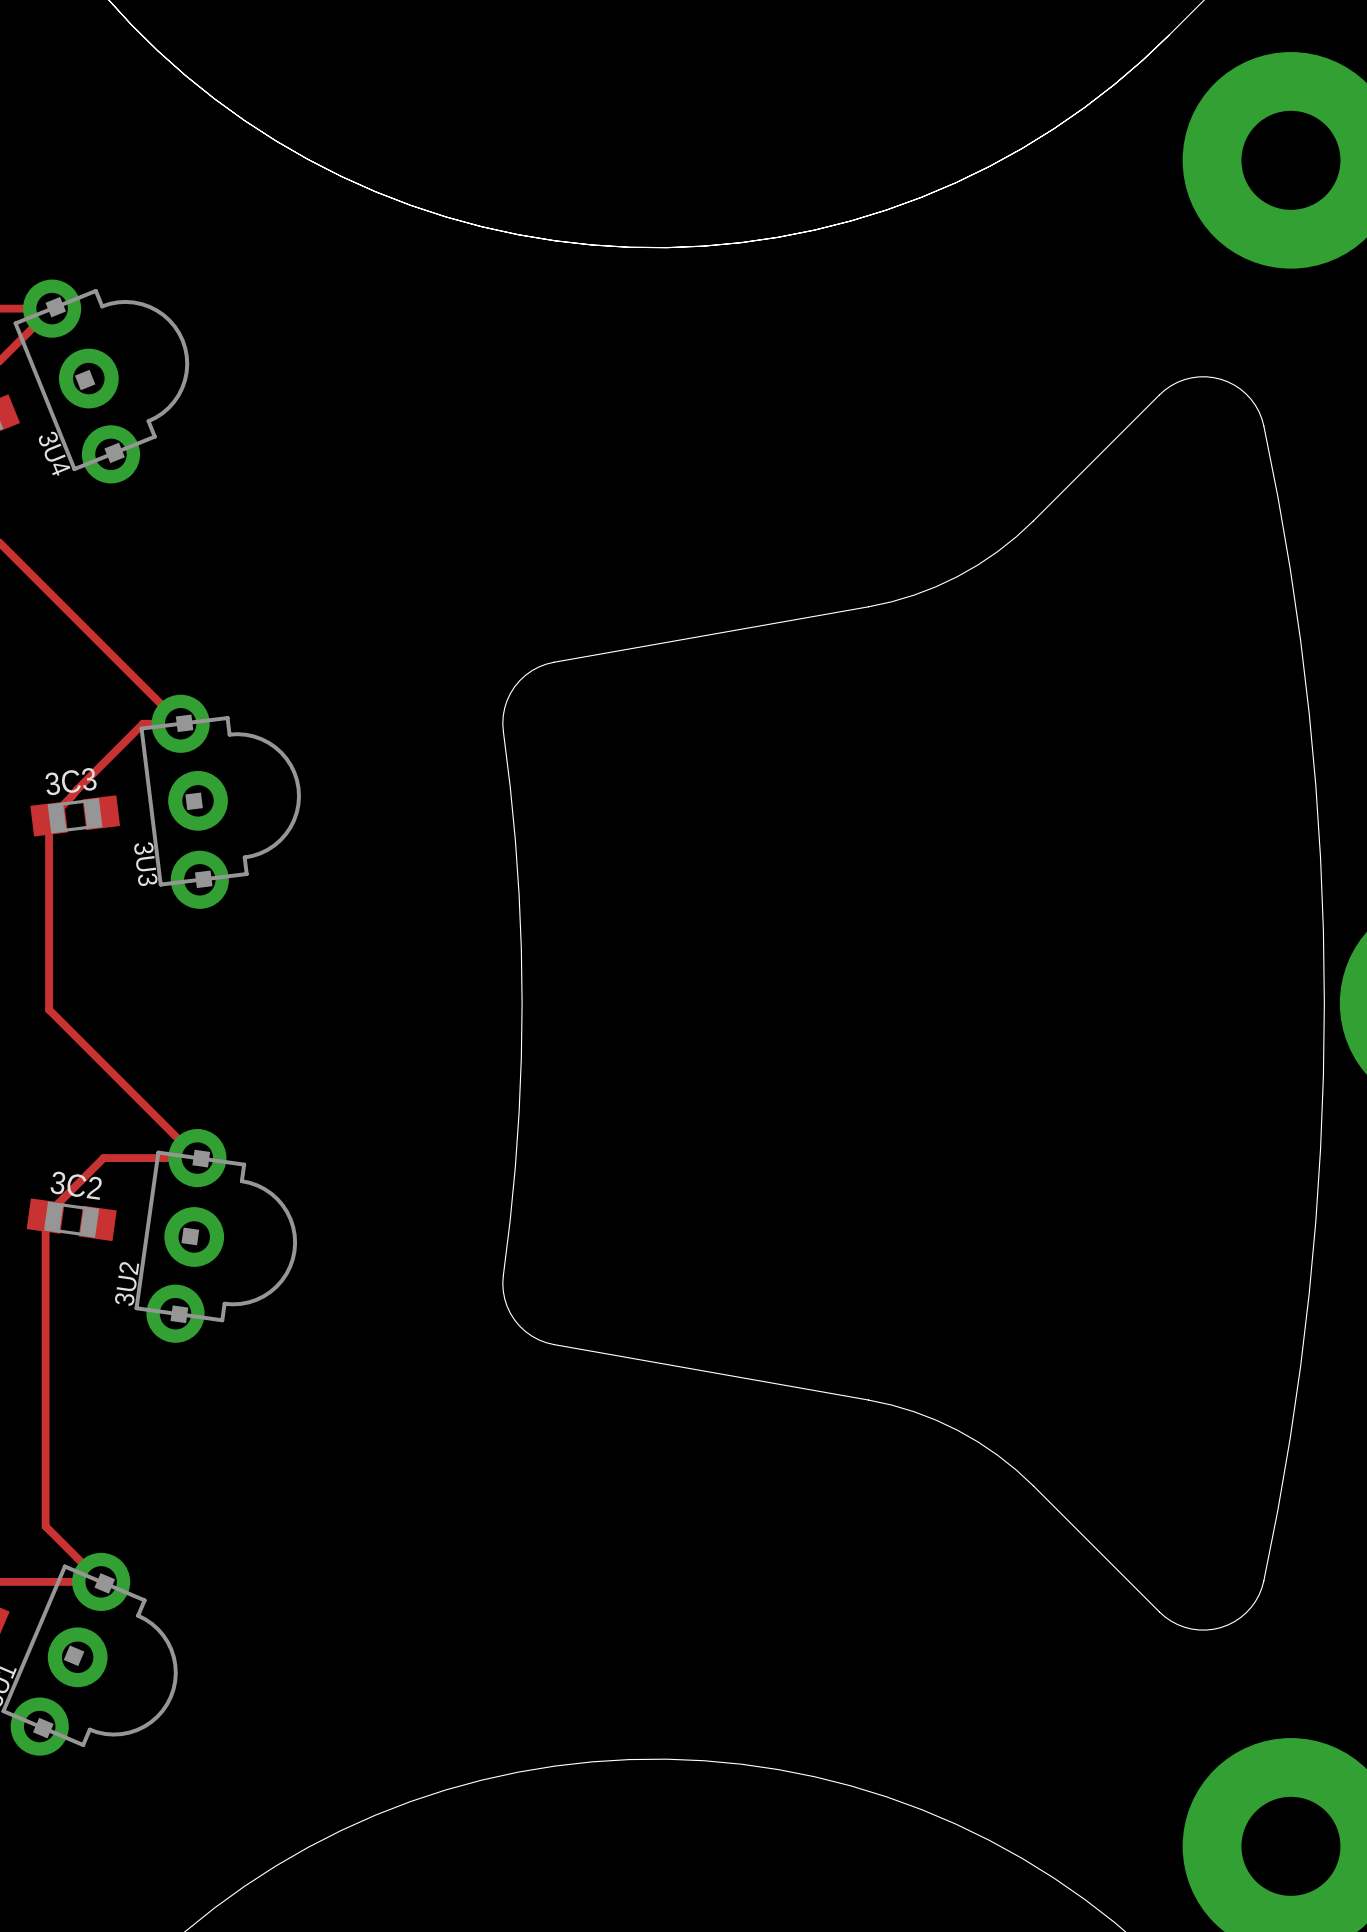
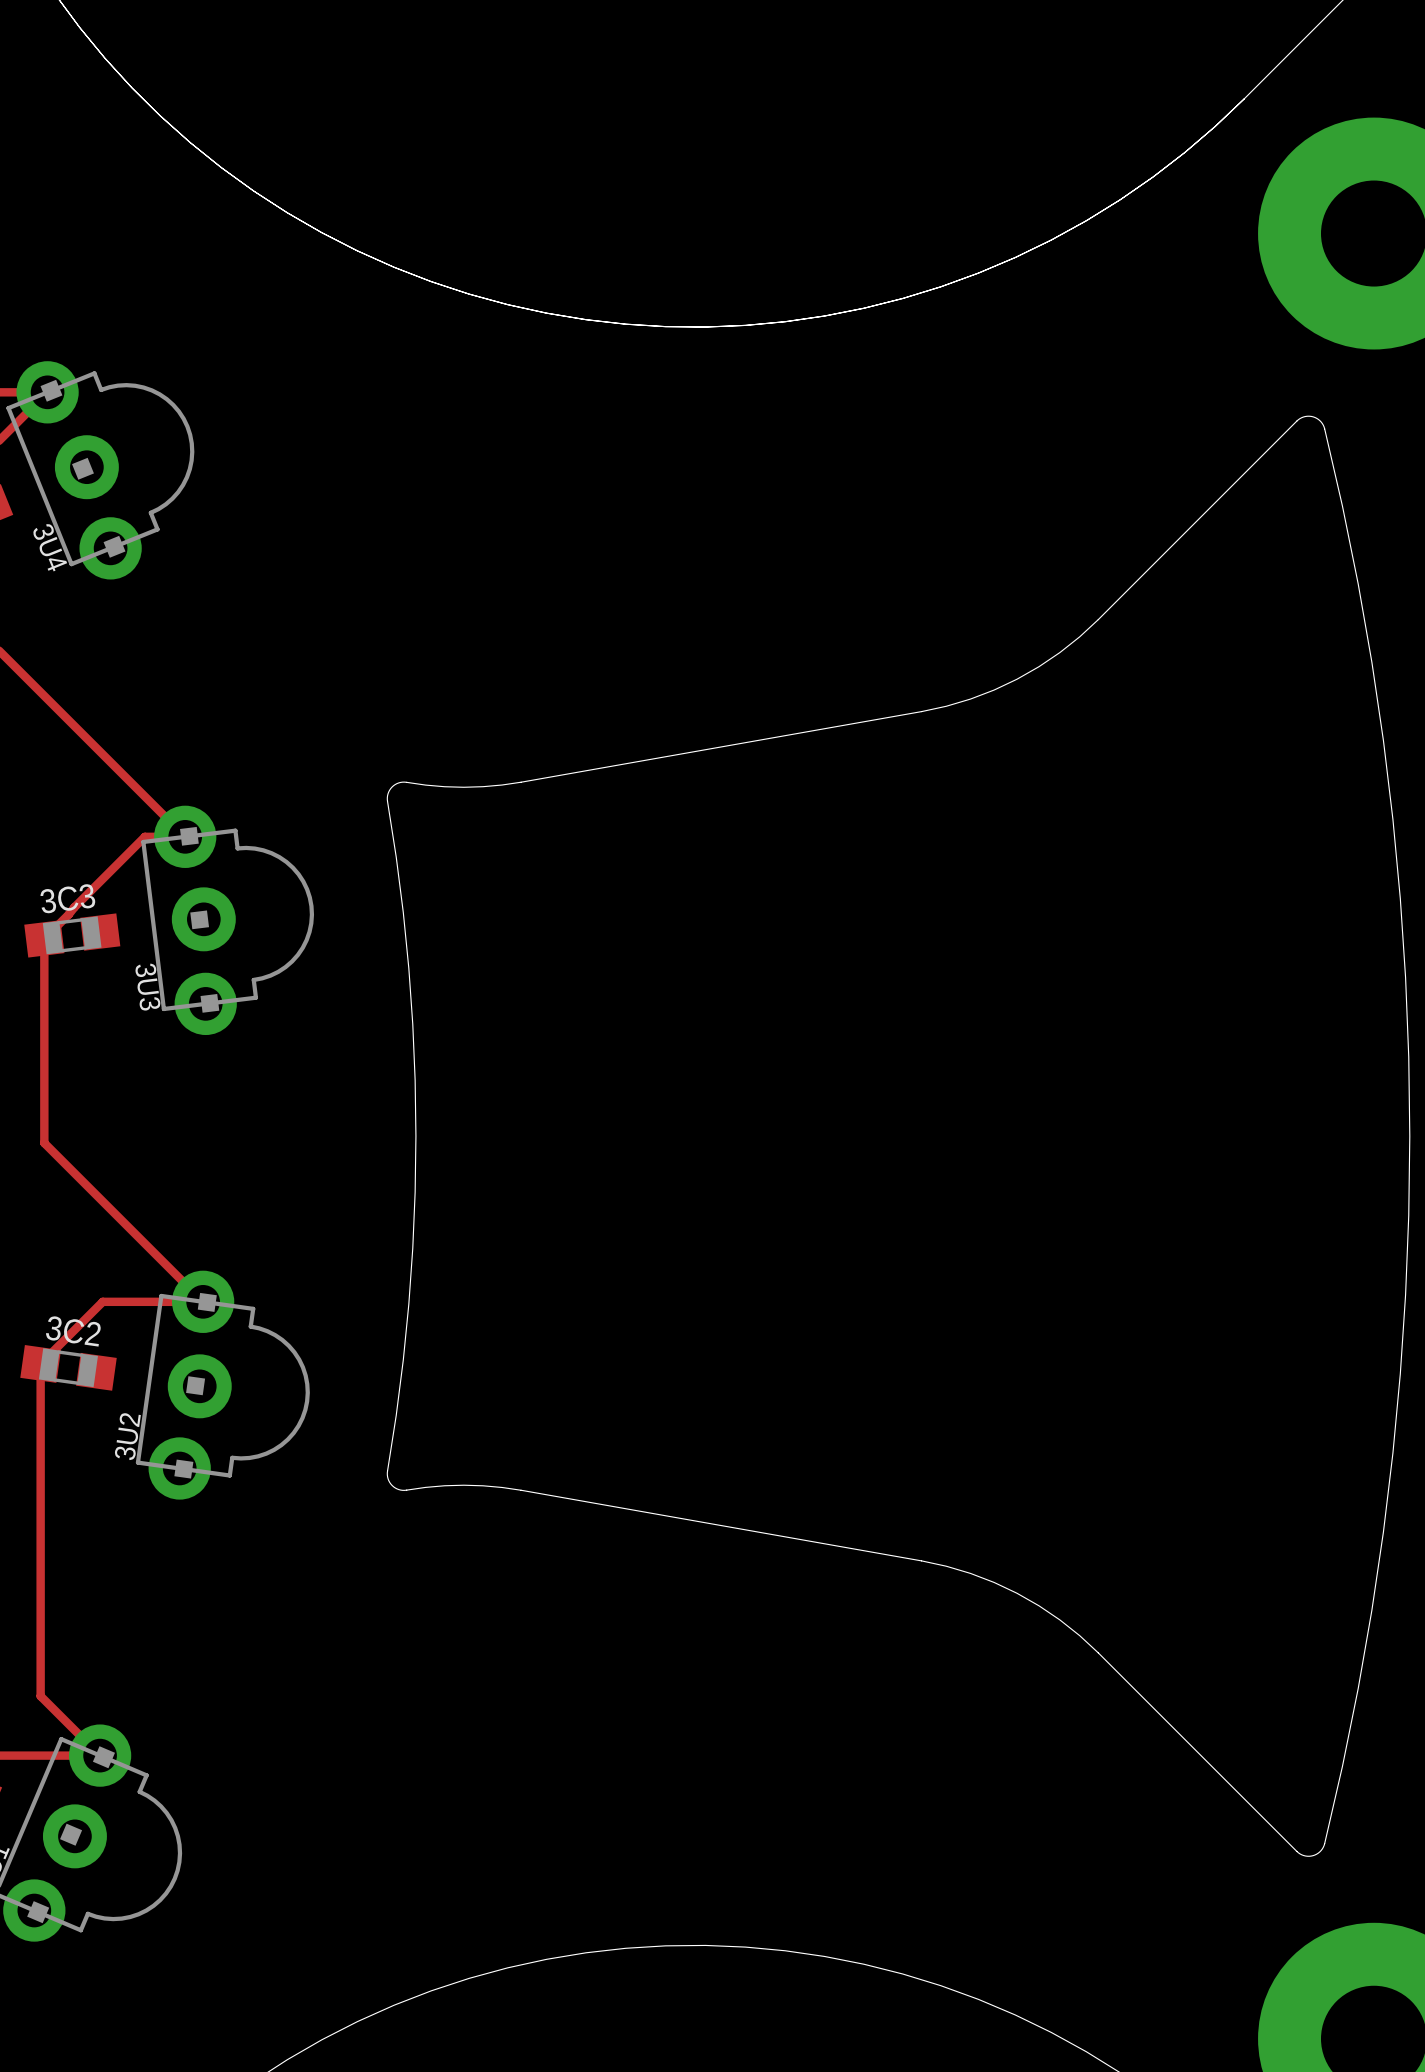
board edge: (1159, 394) (1171, 385) (1191, 377) (1206, 376) (1220, 379) (1234, 385) (1246, 393) (1255, 405) (1263, 425) (1290, 568) (1309, 713) (1320, 858) (1324, 1003) (1320, 1148) (1309, 1293) (1290, 1438) (1263, 1581) (1259, 1595) (1251, 1607) (1240, 1617) (1220, 1627) (1206, 1630) (1191, 1629) (1171, 1621) (1159, 1612) -> (1233, 484) (1299, 418) (1313, 416) (1322, 423) (1342, 506) (1358, 583) (1383, 740) (1392, 819) (1405, 977) (1409, 1136) (1405, 1294) (1392, 1453) (1383, 1531) (1358, 1688) (1342, 1766) (1322, 1848) (1313, 1855) (1299, 1853) (1233, 1787)
board edge: (553, 662) (531, 670) (514, 686) (504, 708) (502, 723) (515, 840) (522, 1003) (519, 1112) (503, 1290) (507, 1306) (519, 1326) (531, 1336) (553, 1344) -> (584, 770) (483, 786) (444, 786) (400, 782) (390, 788) (387, 799) (403, 912) (408, 968) (412, 1024) (415, 1136) (412, 1248) (408, 1304) (388, 1478) (393, 1486) (402, 1490) (444, 1485) (483, 1485) (584, 1501)

